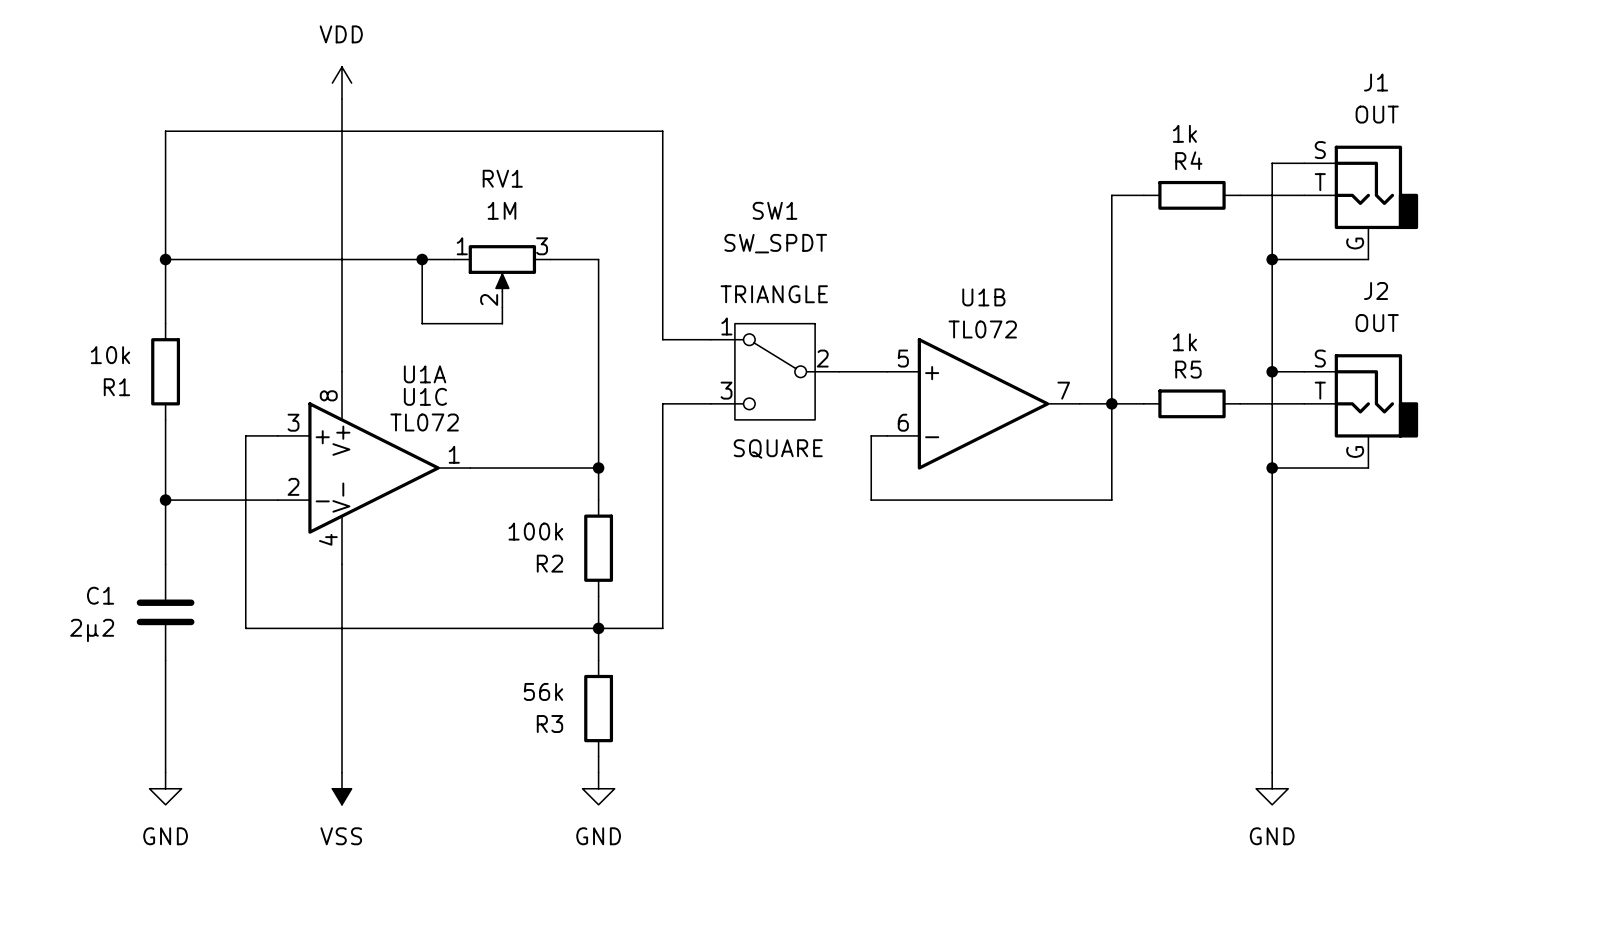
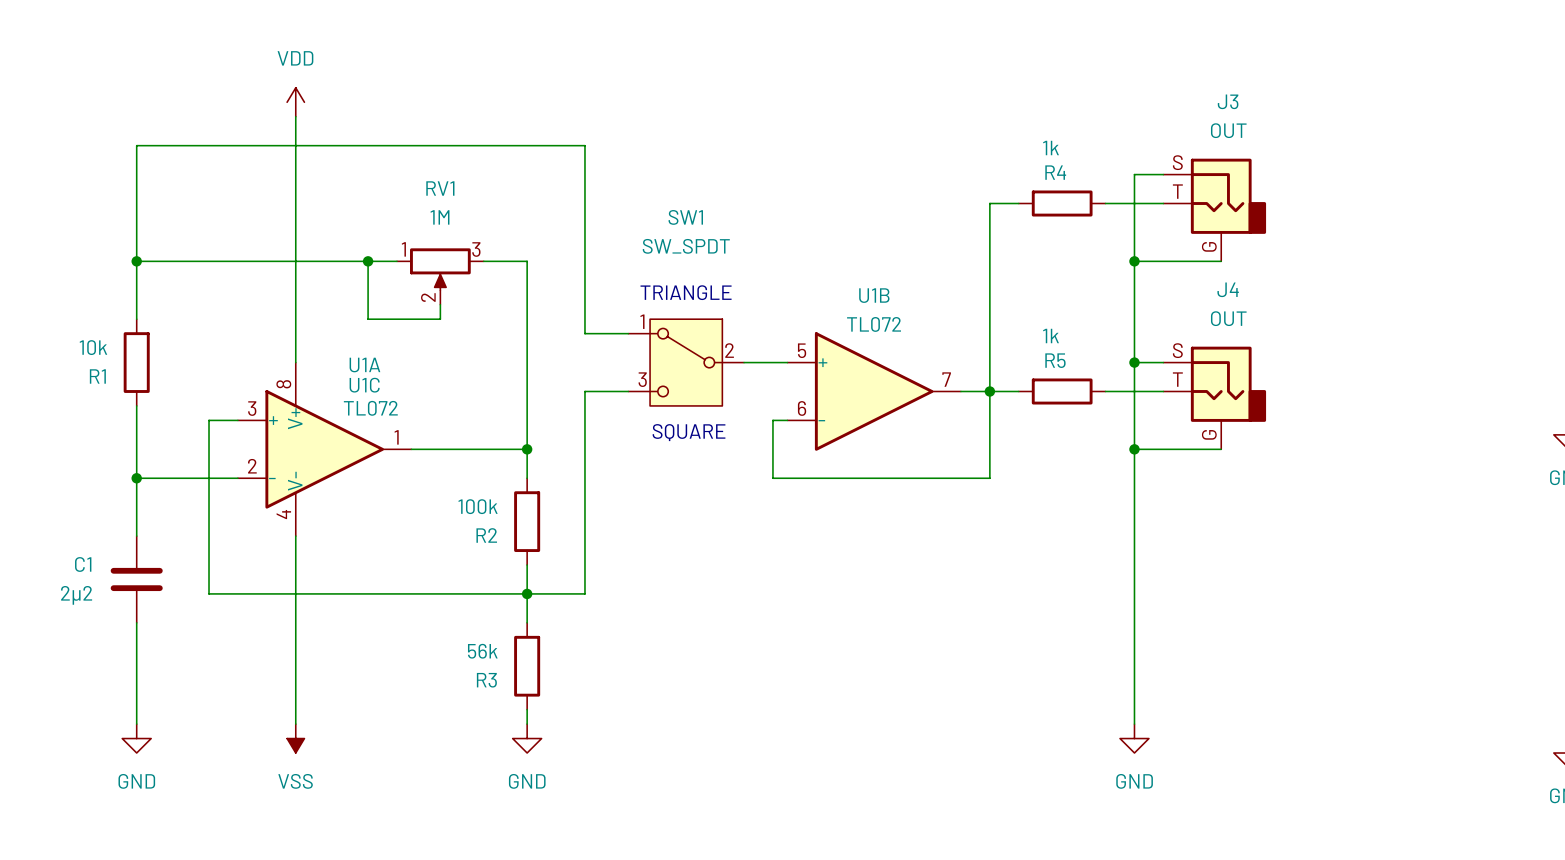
J1 name: J1 (1376, 82) -> J3 (1228, 101)
J2 name: J2 (1376, 291) -> J4 (1228, 289)

